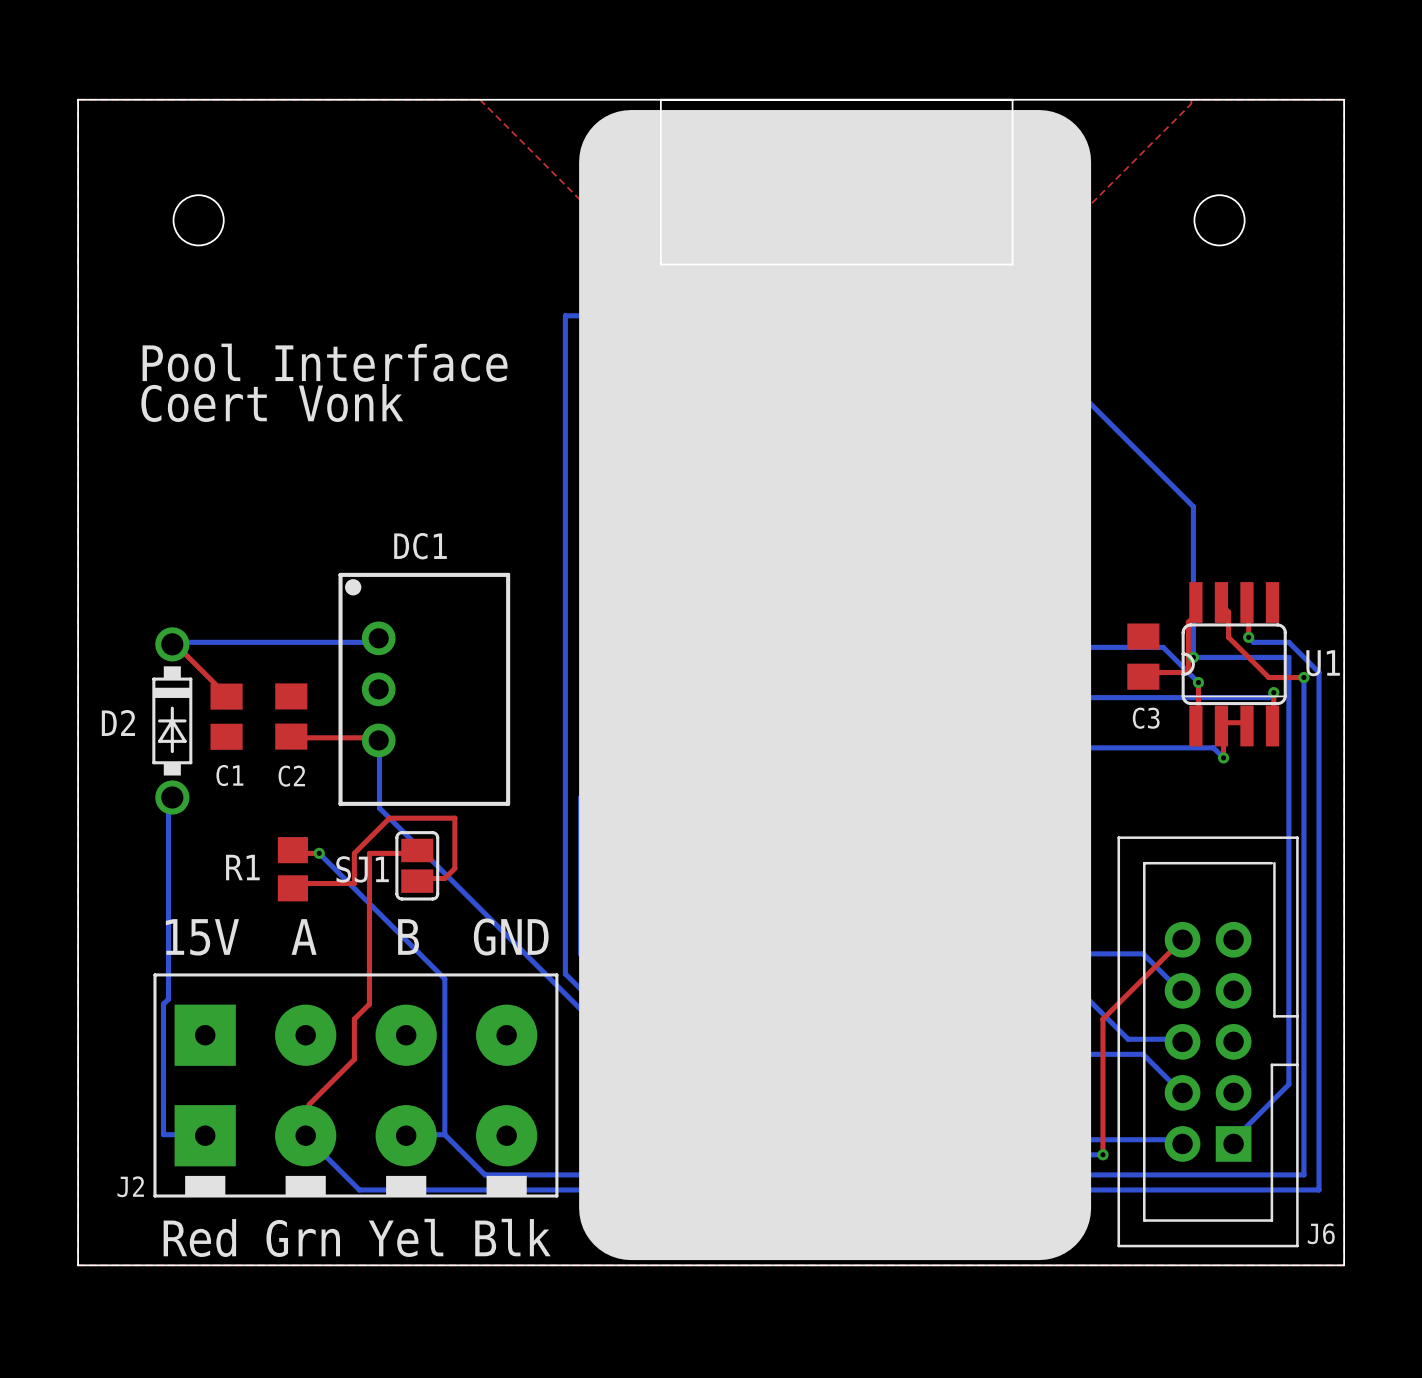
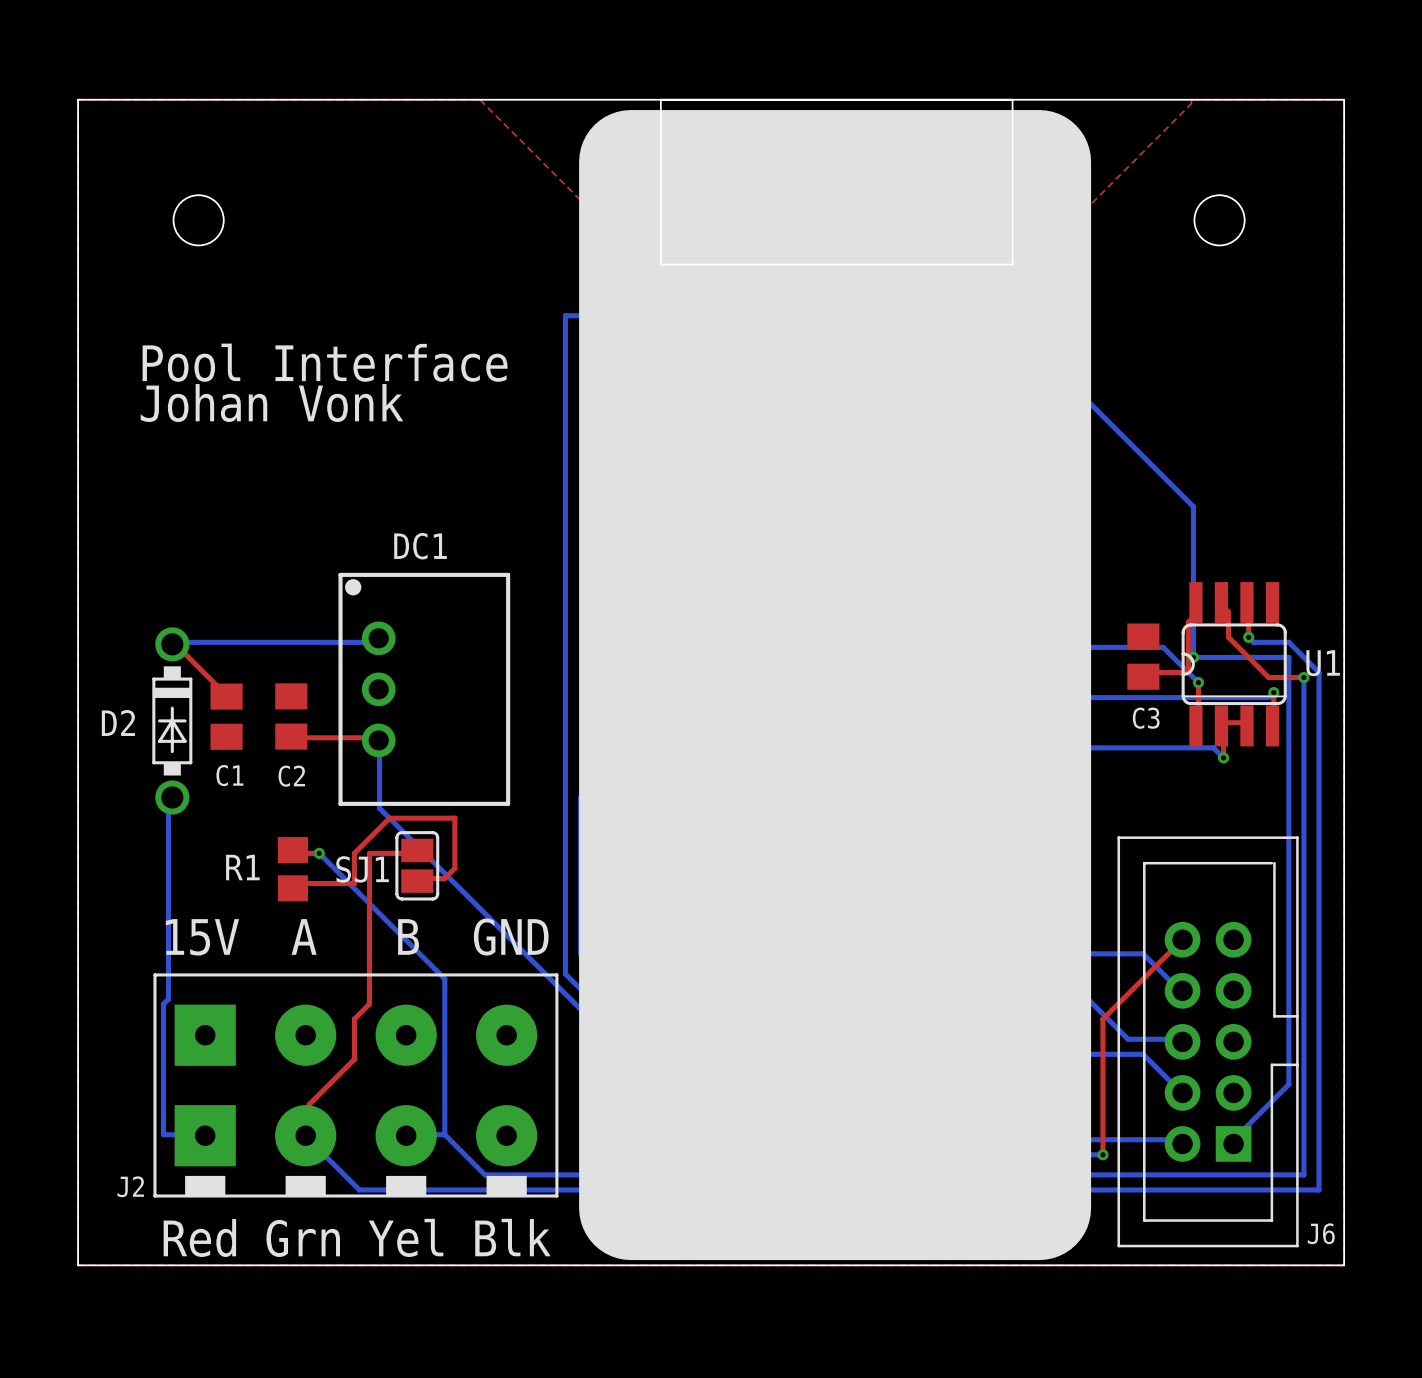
text: Coert Vonk (272, 403) -> Johan Vonk (271, 403)

